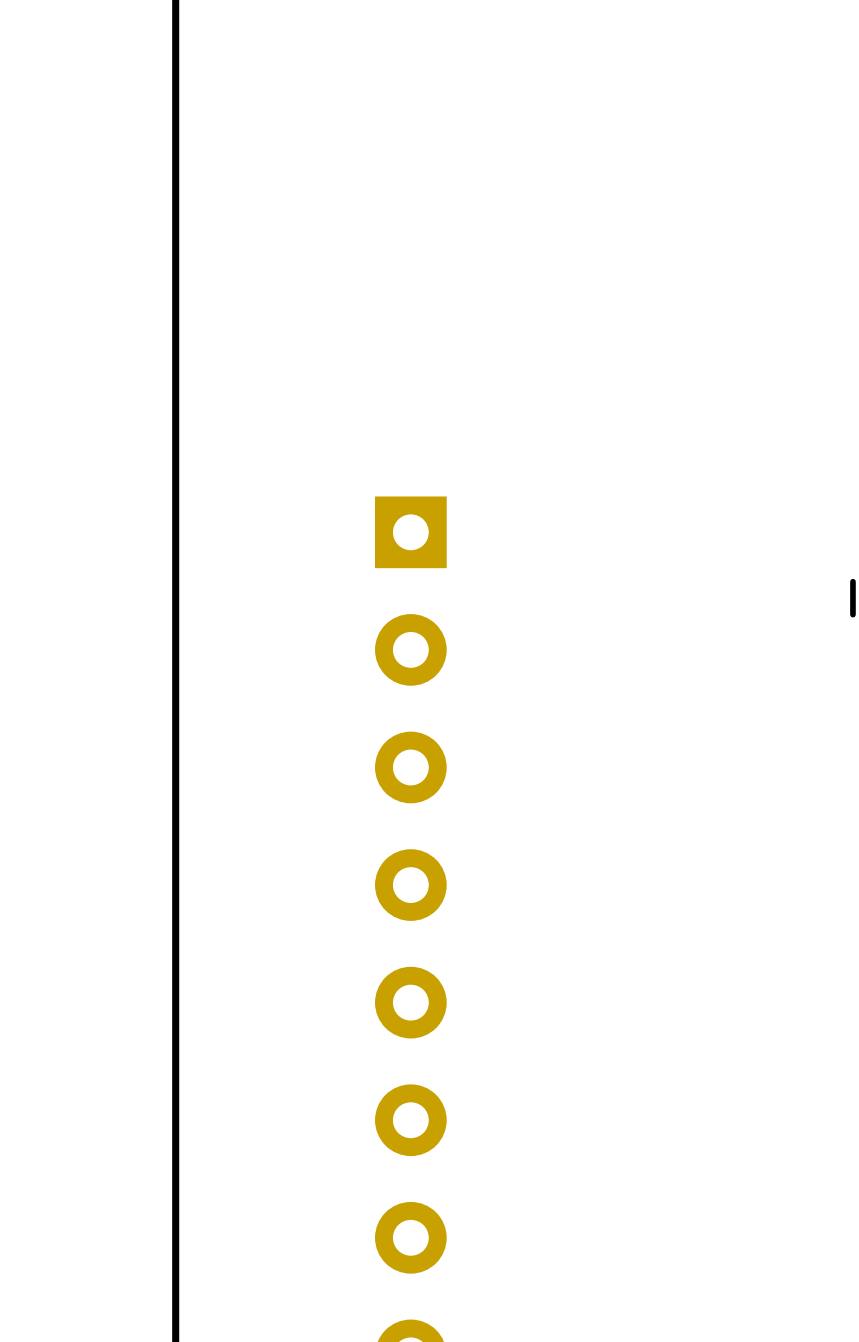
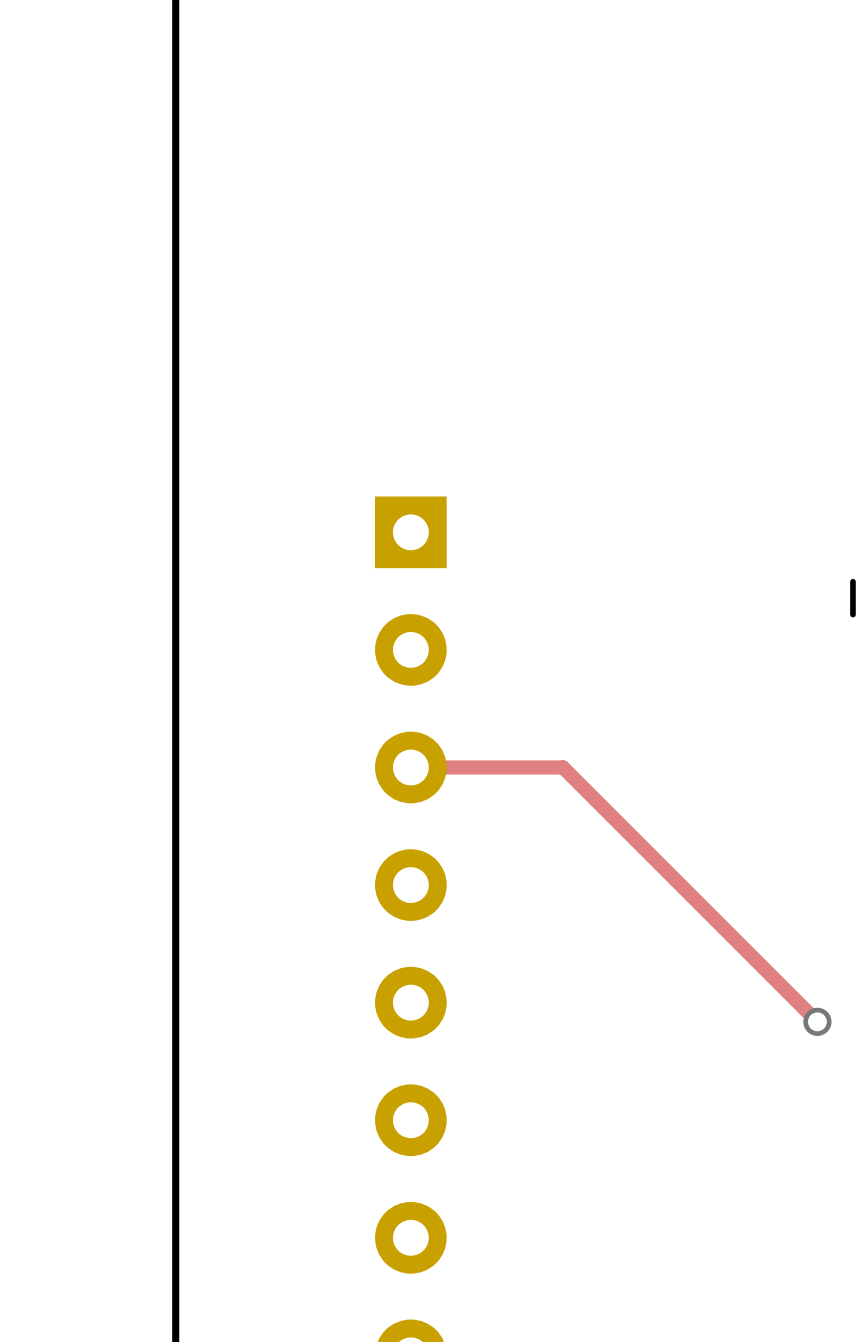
track: none -> (410, 767) (563, 767) (817, 1021)
via: none -> (817, 1021)

